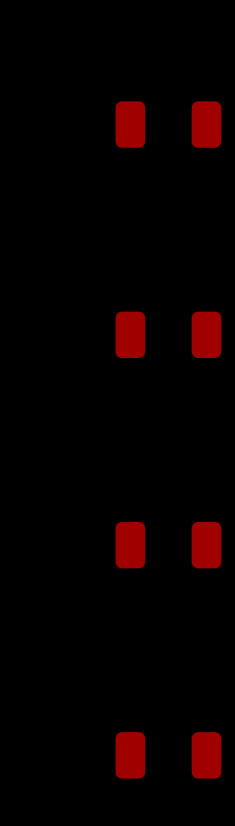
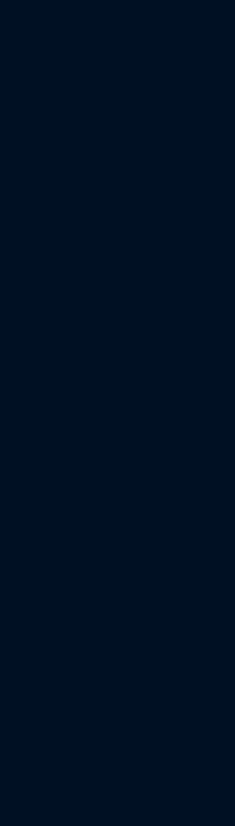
part: (168, 124) -> none
part: (168, 334) -> none
part: (168, 545) -> none
part: (168, 755) -> none

